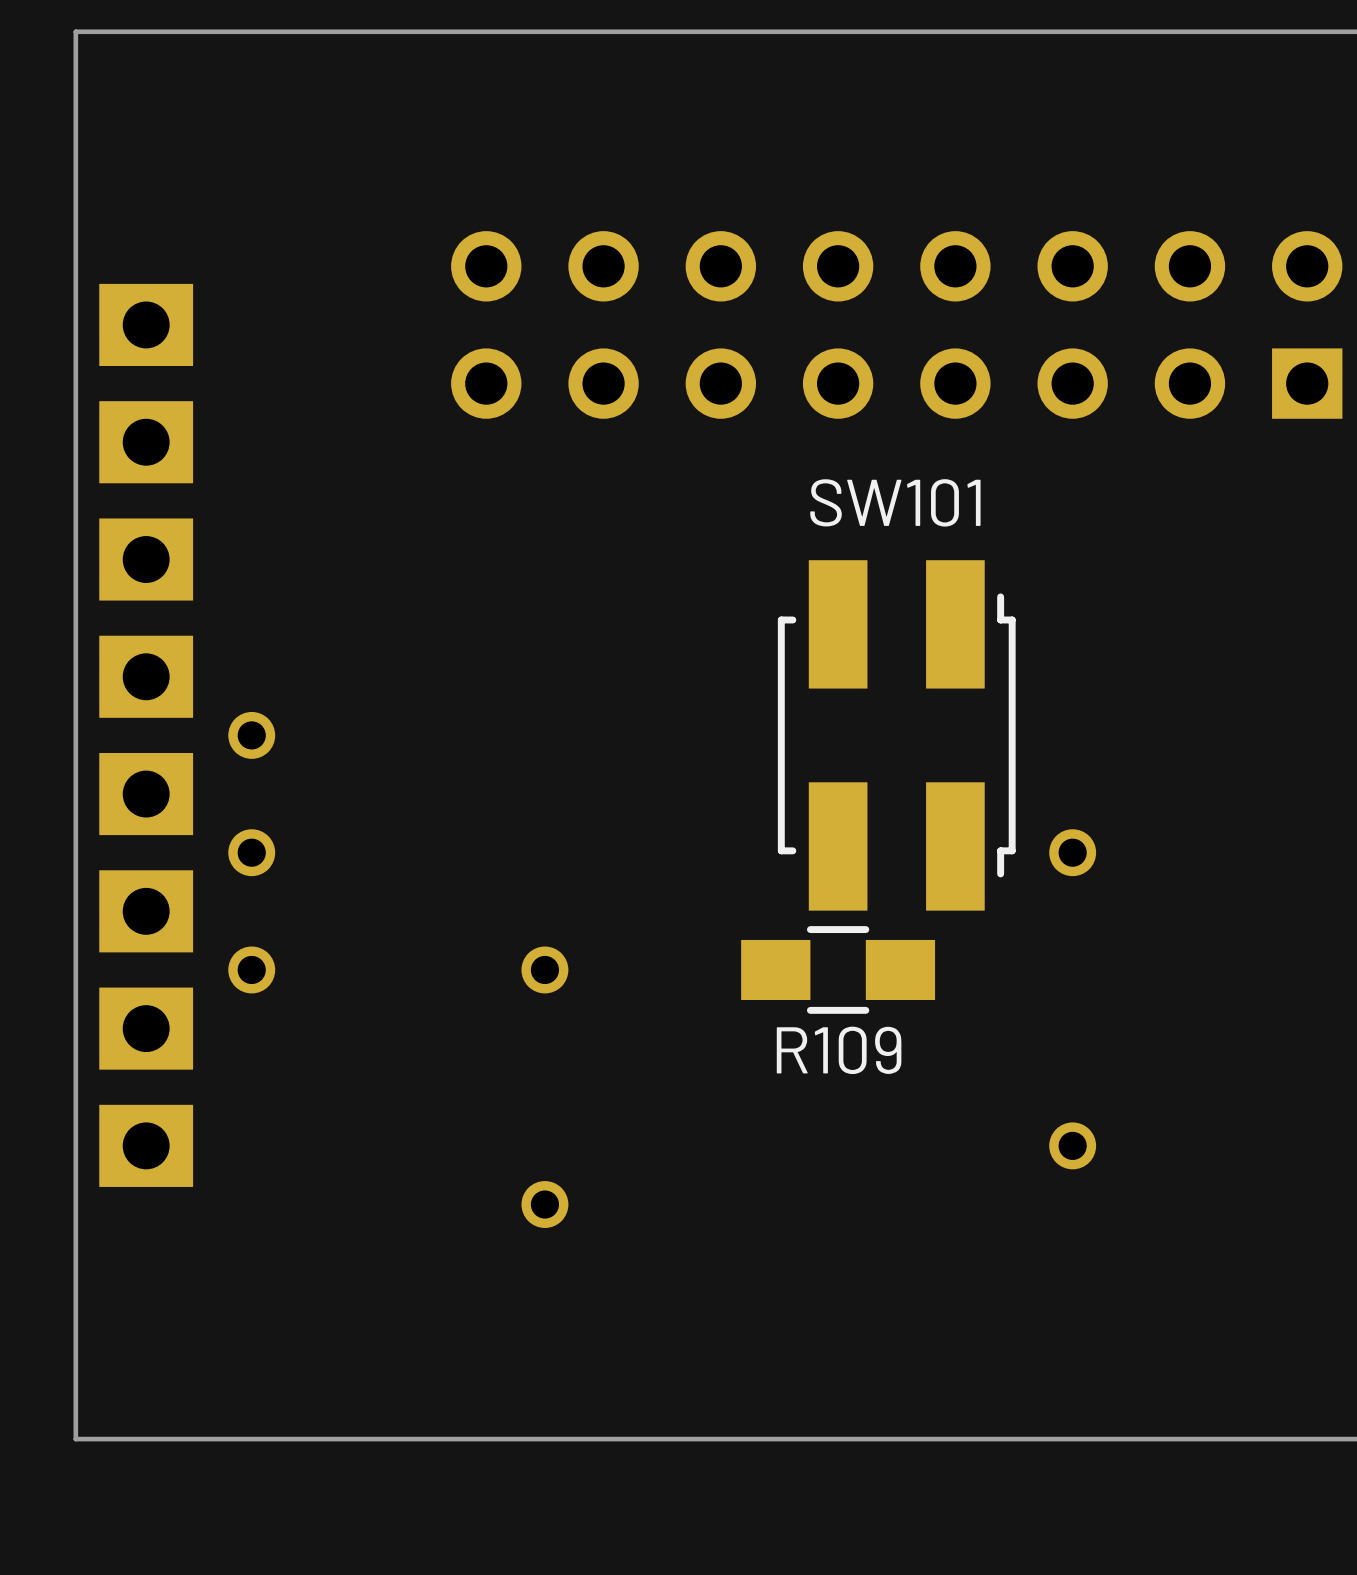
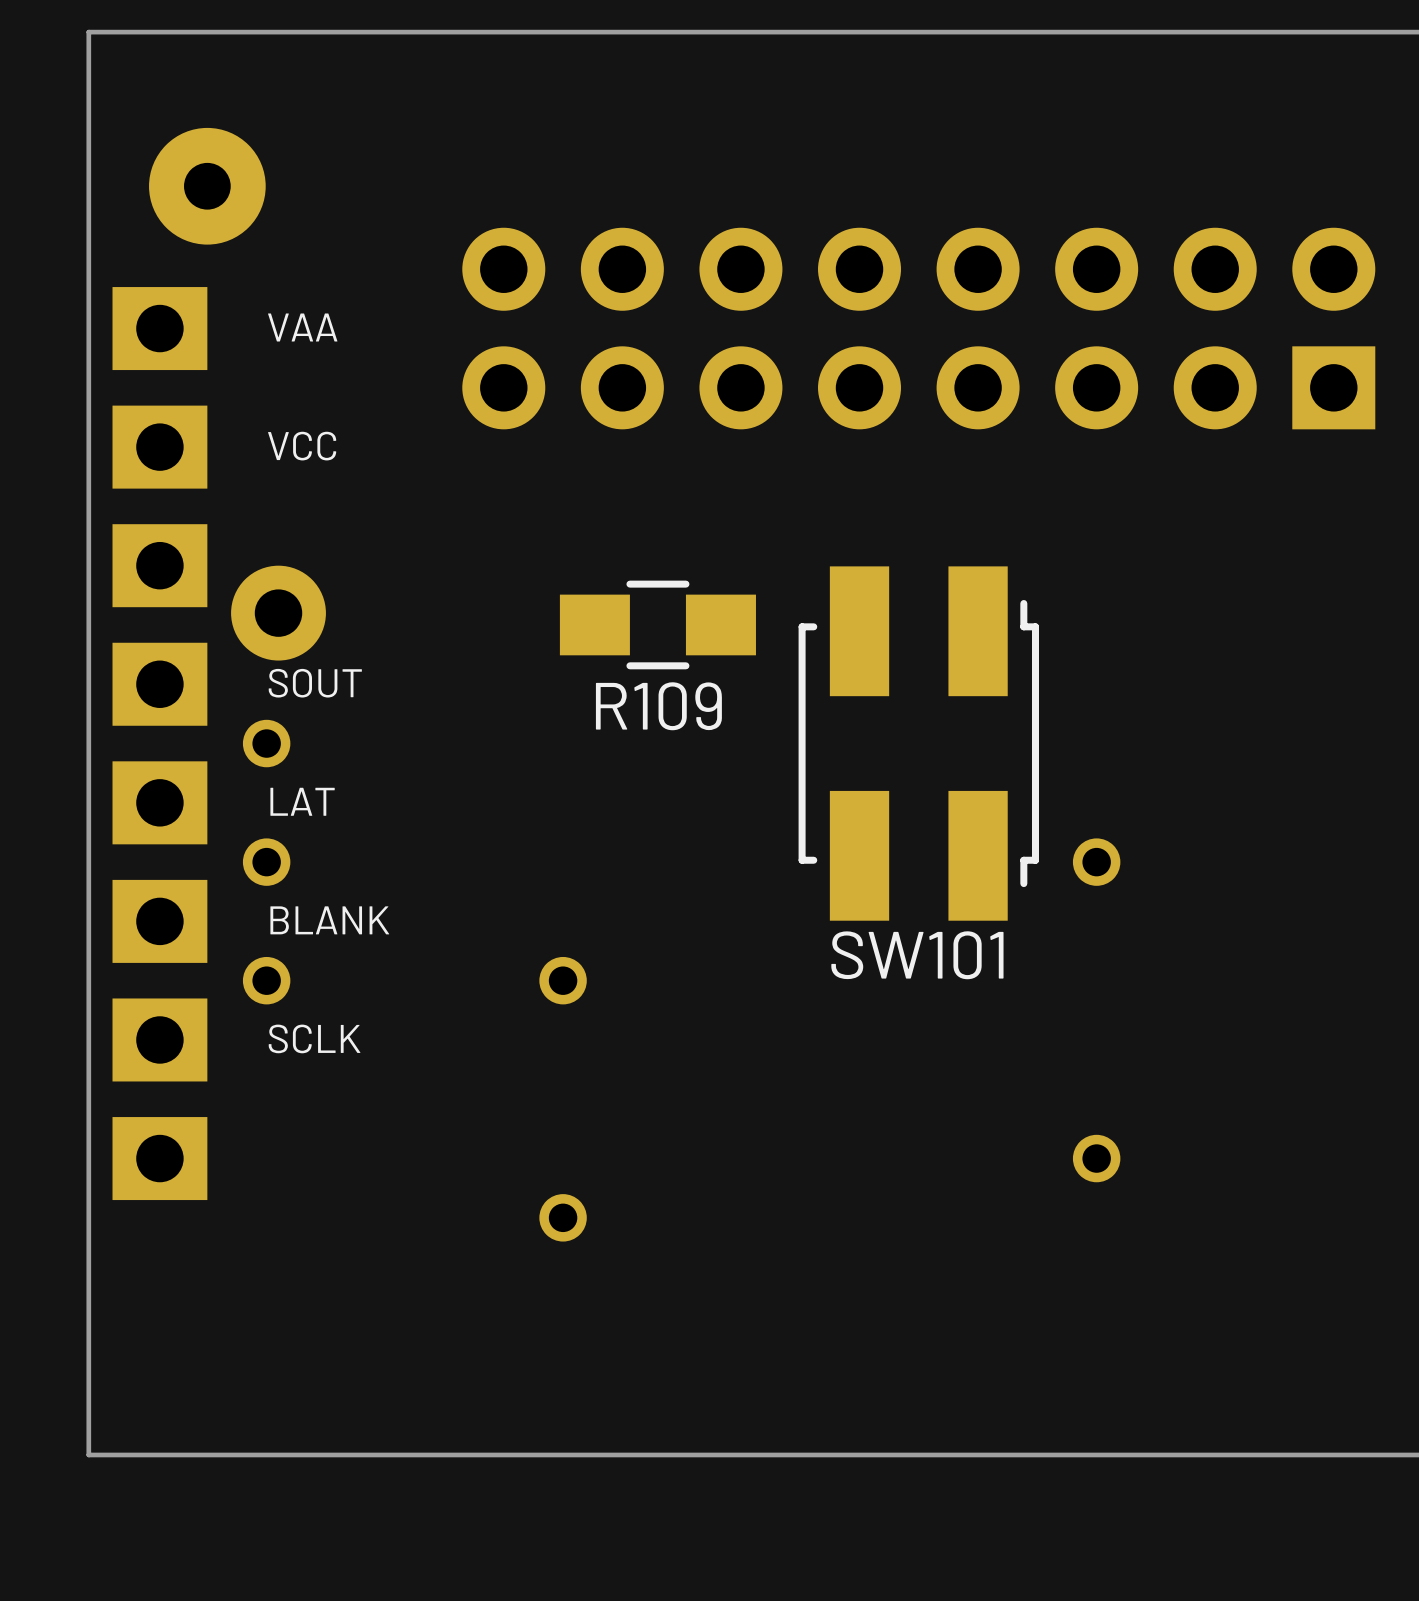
part: none -> (207, 186)
part footprint: [451, 231, 1343, 419] -> [462, 227, 1376, 430]
text: none -> VAA (302, 327)
text: none -> VCC (302, 446)
SW101 name position: SW101 (895, 502) -> SW101 (917, 955)
part: none -> (278, 613)
text: none -> SOUT (315, 683)
text: none -> LAT (302, 801)
text: none -> BLANK (329, 920)
R109 position: (838, 969) -> (657, 624)
text: none -> SCLK (314, 1038)

